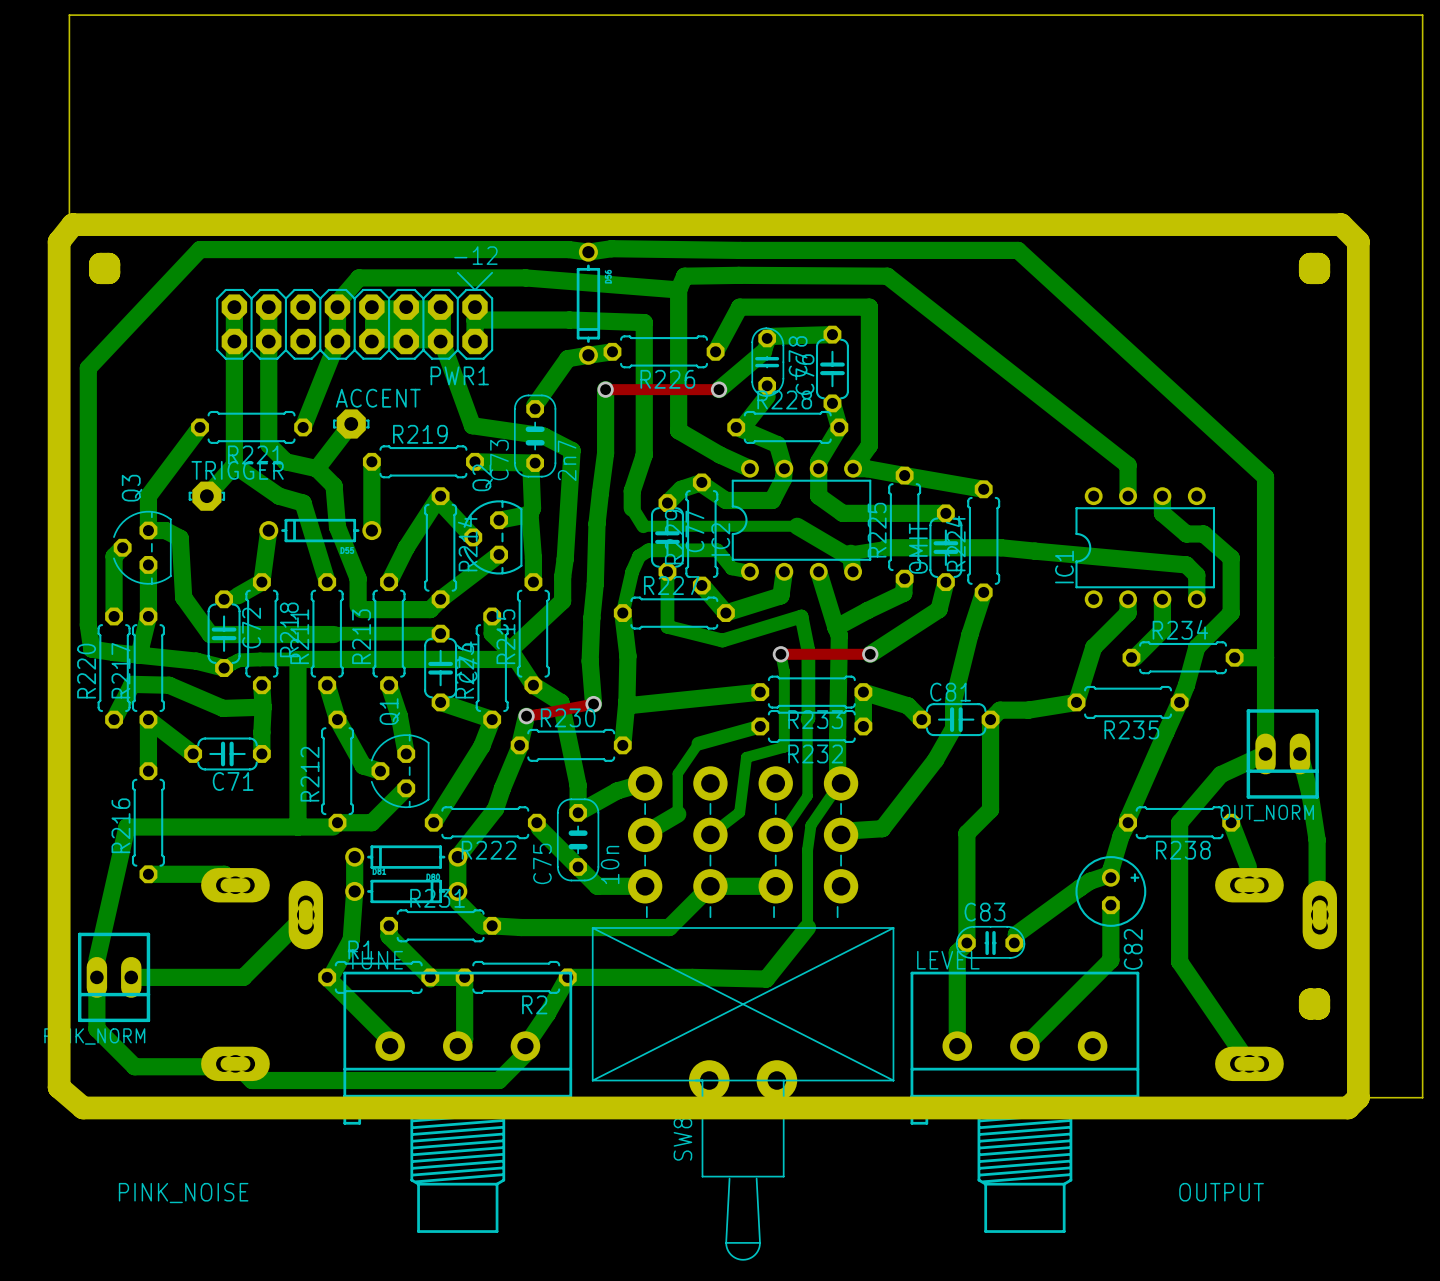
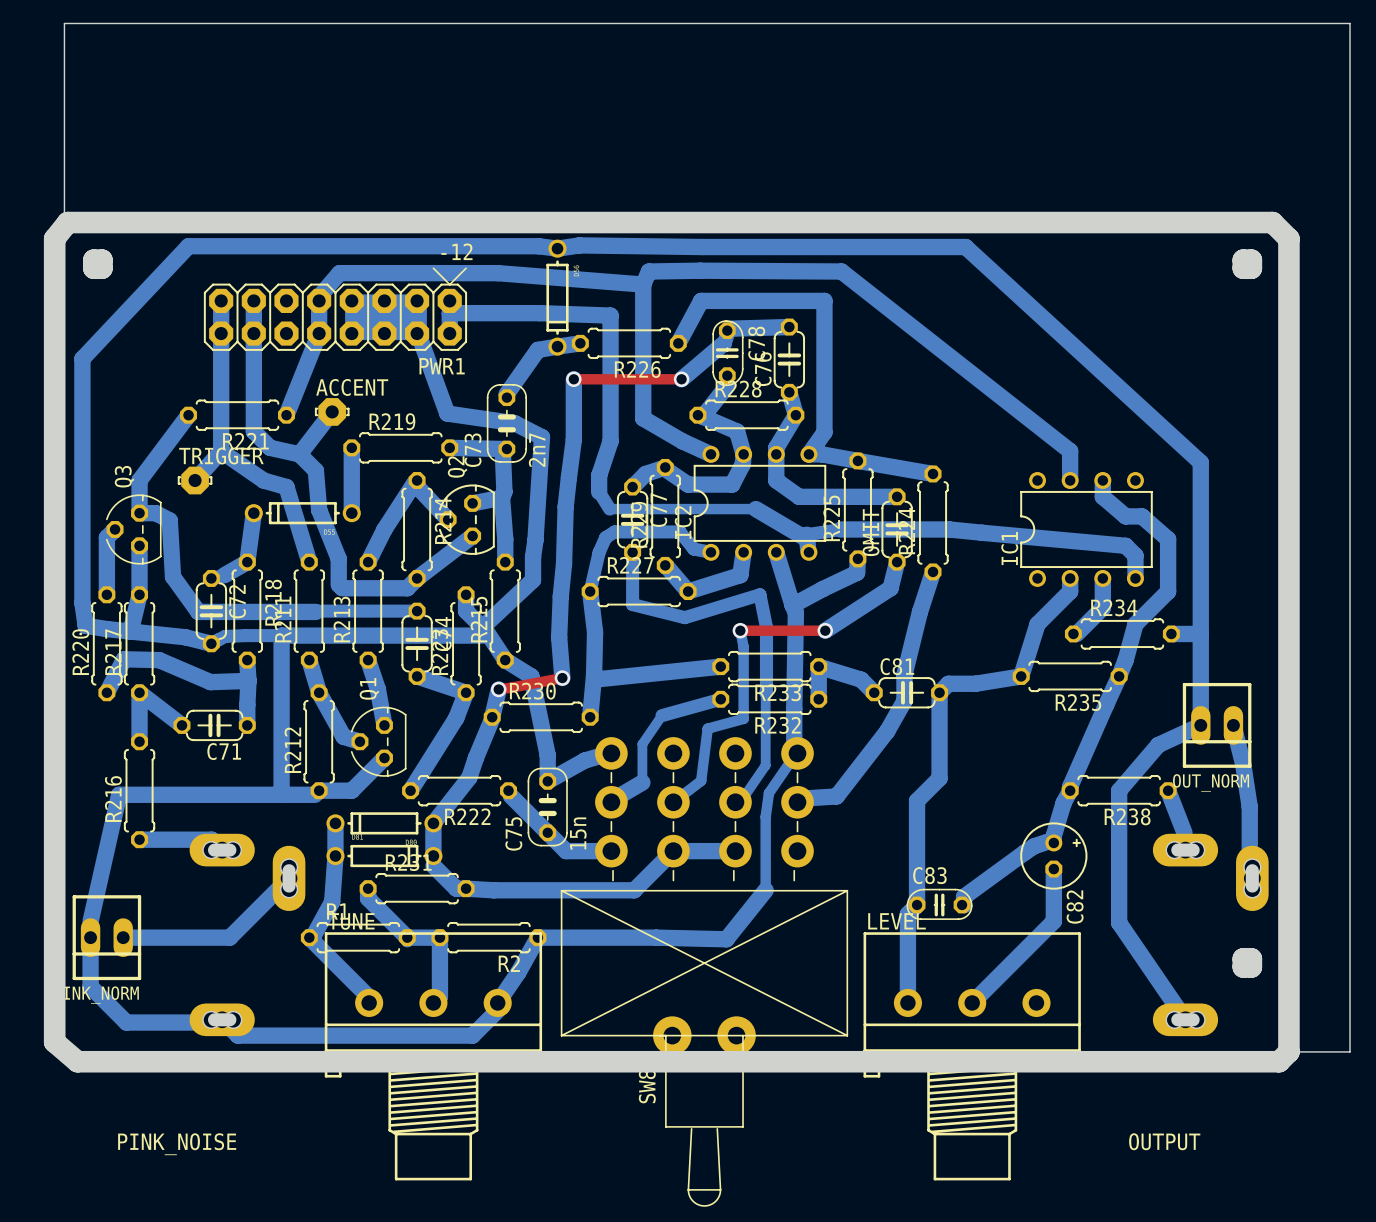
C75 value: 10n (610, 865) -> 15n (578, 833)

